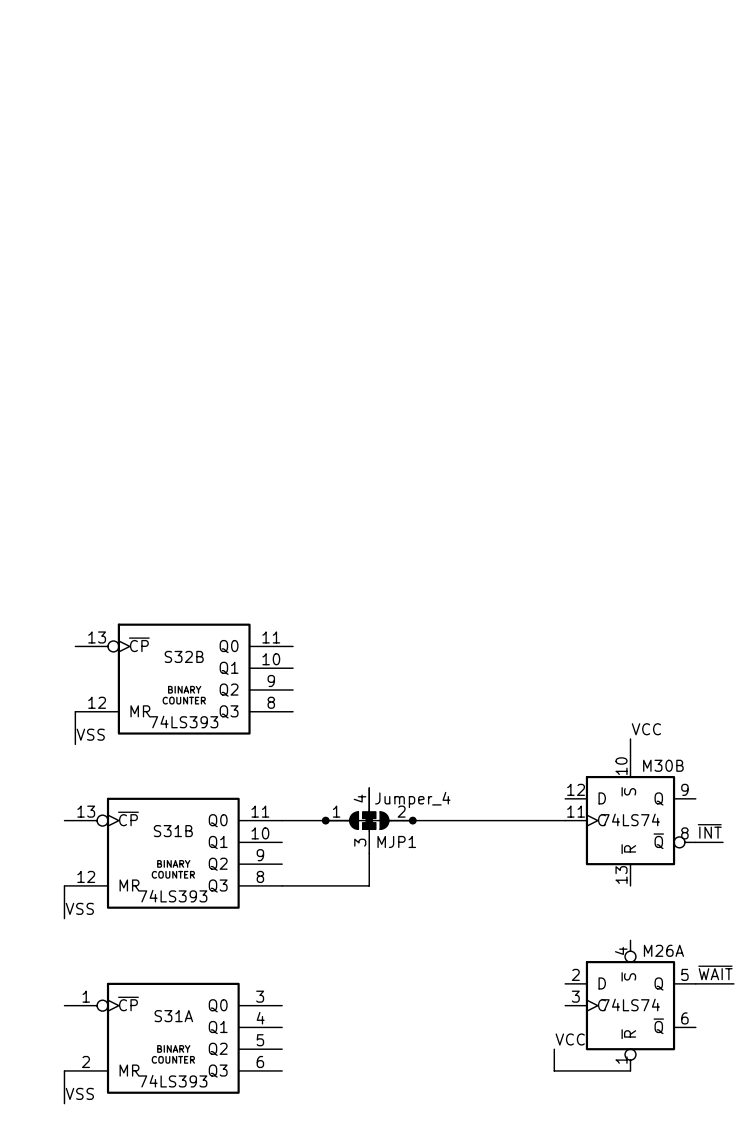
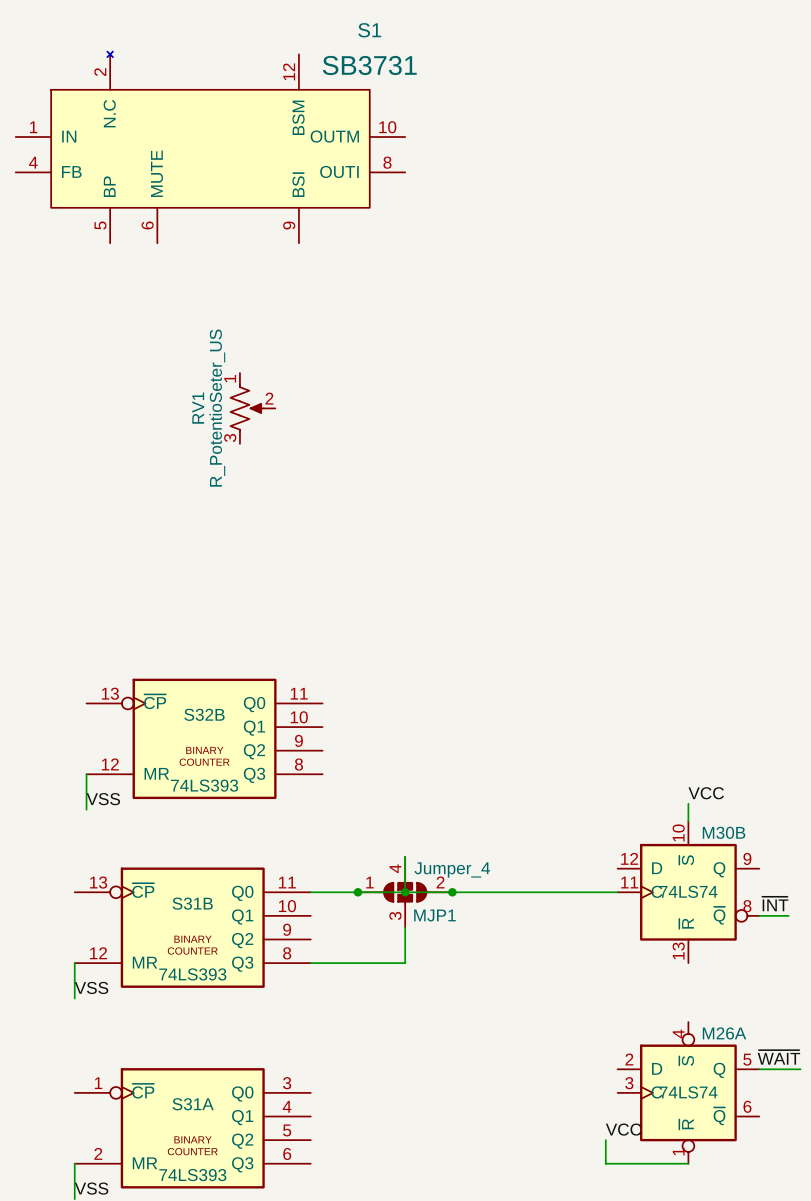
S1: none -> SB3731 (210, 147)
RV1: none -> R_PotentioSeter_US (252, 408)

